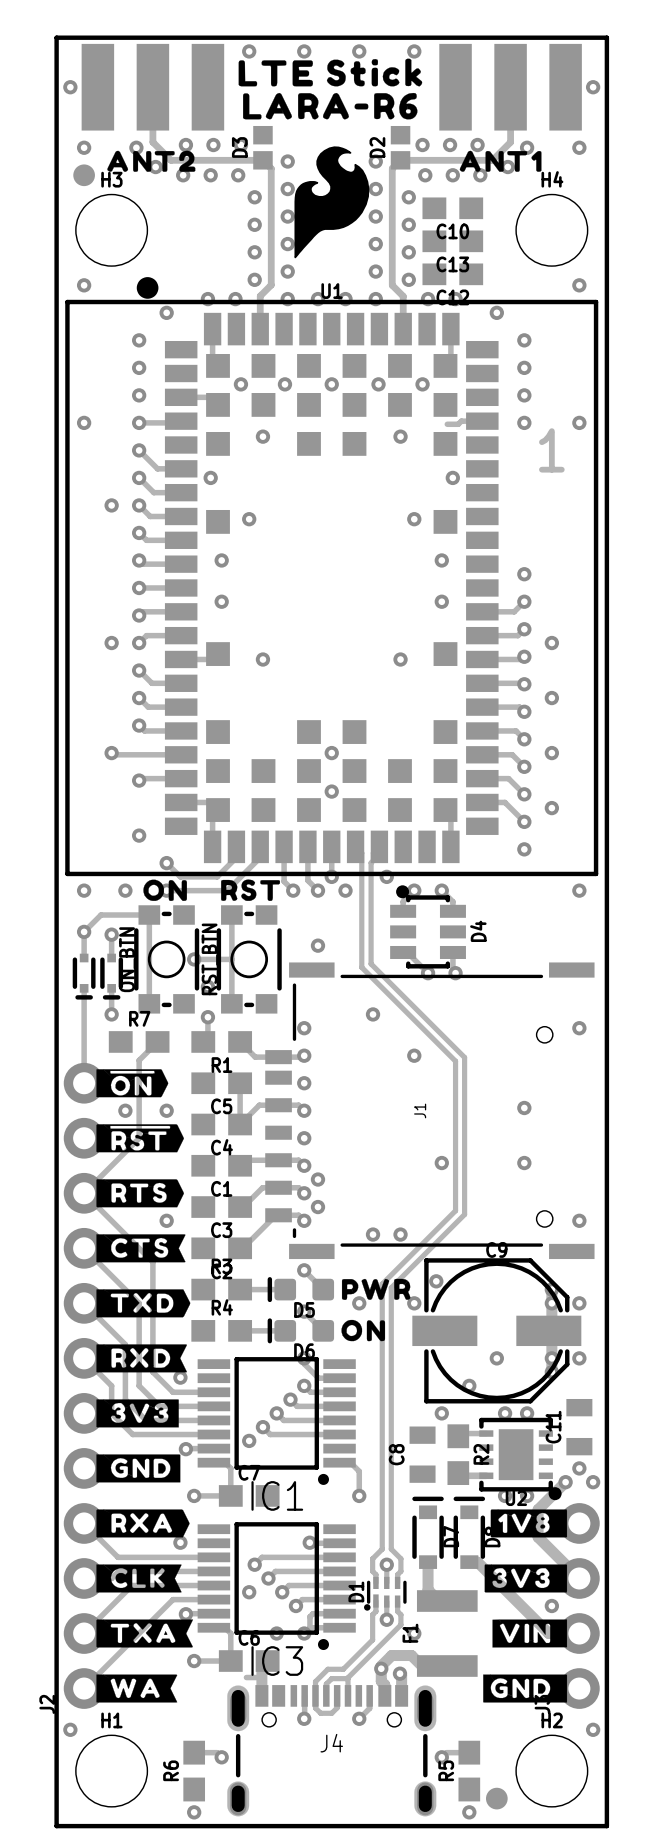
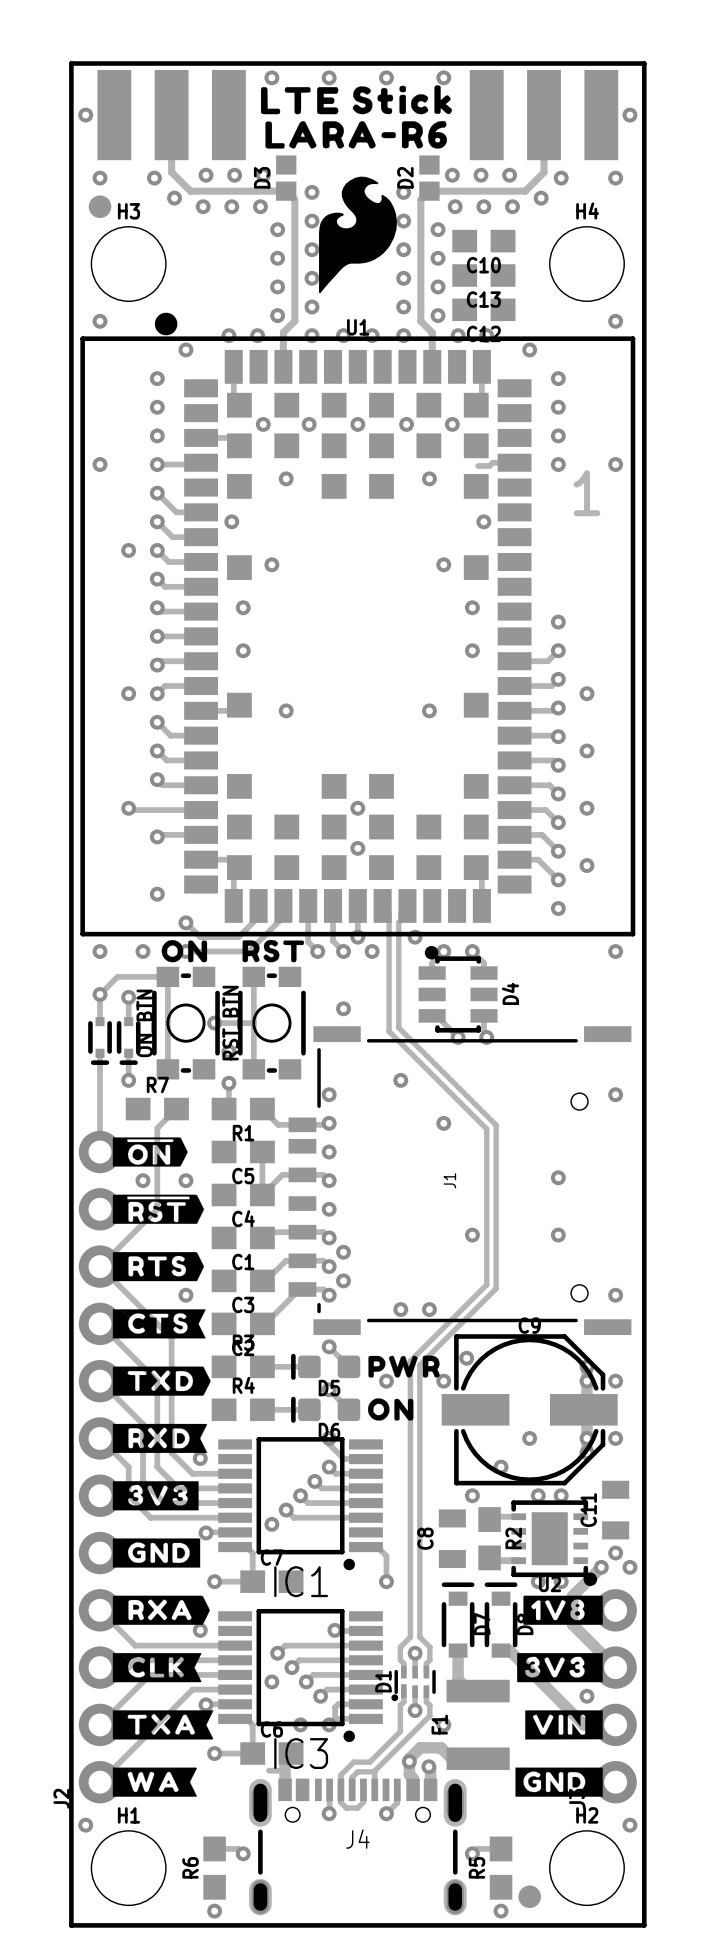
drawing: [107, 150, 196, 172] -> none
drawing: [459, 150, 542, 172] -> none

